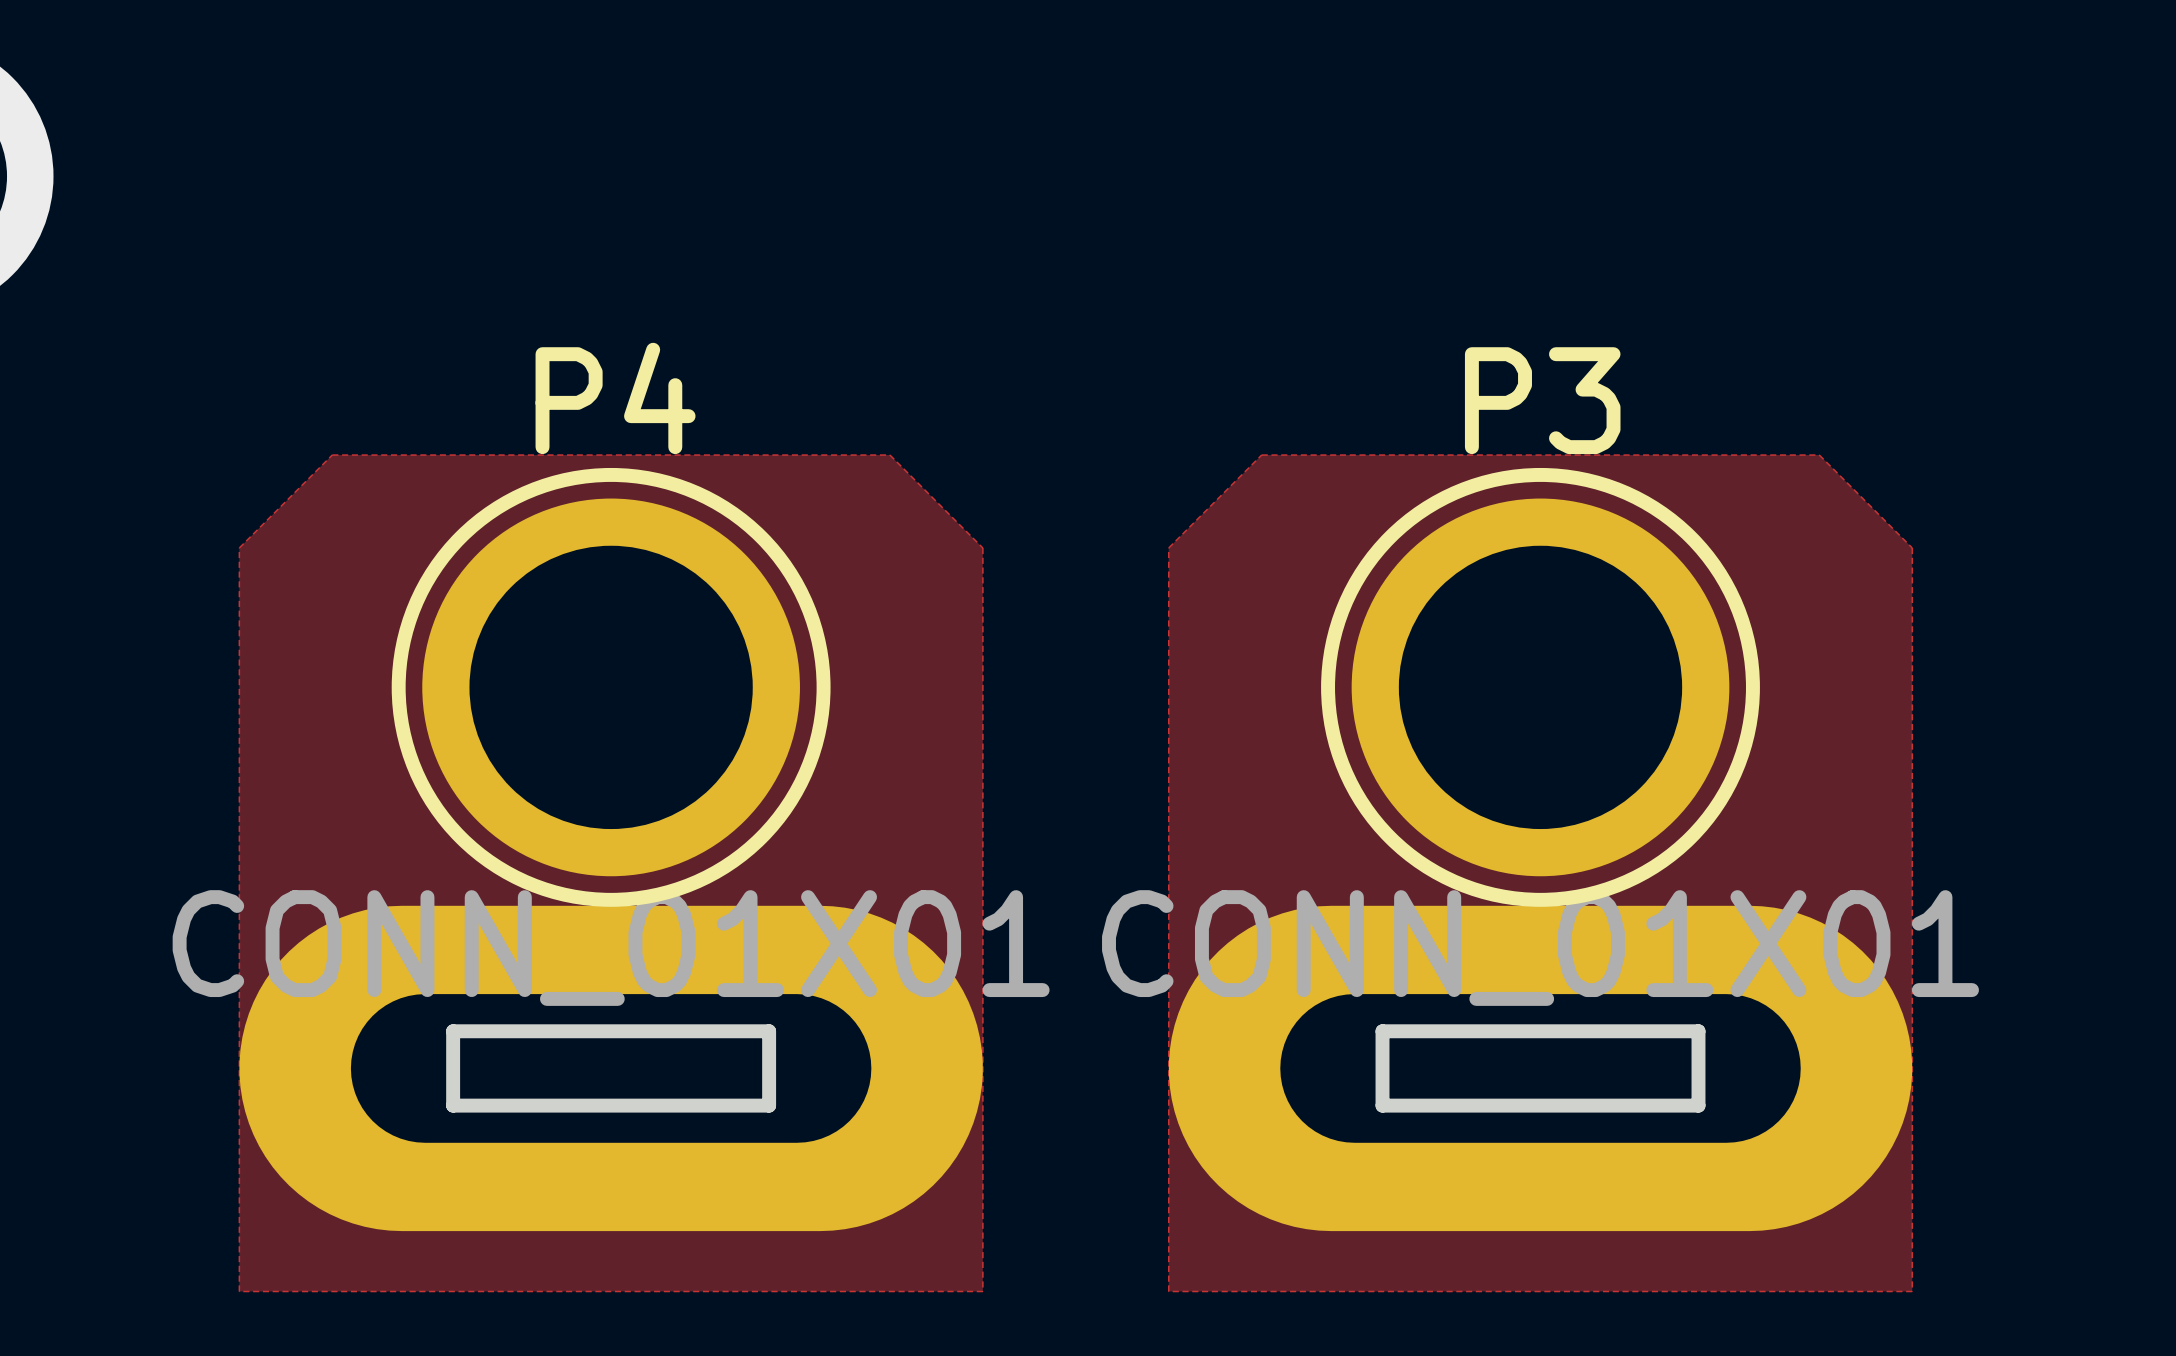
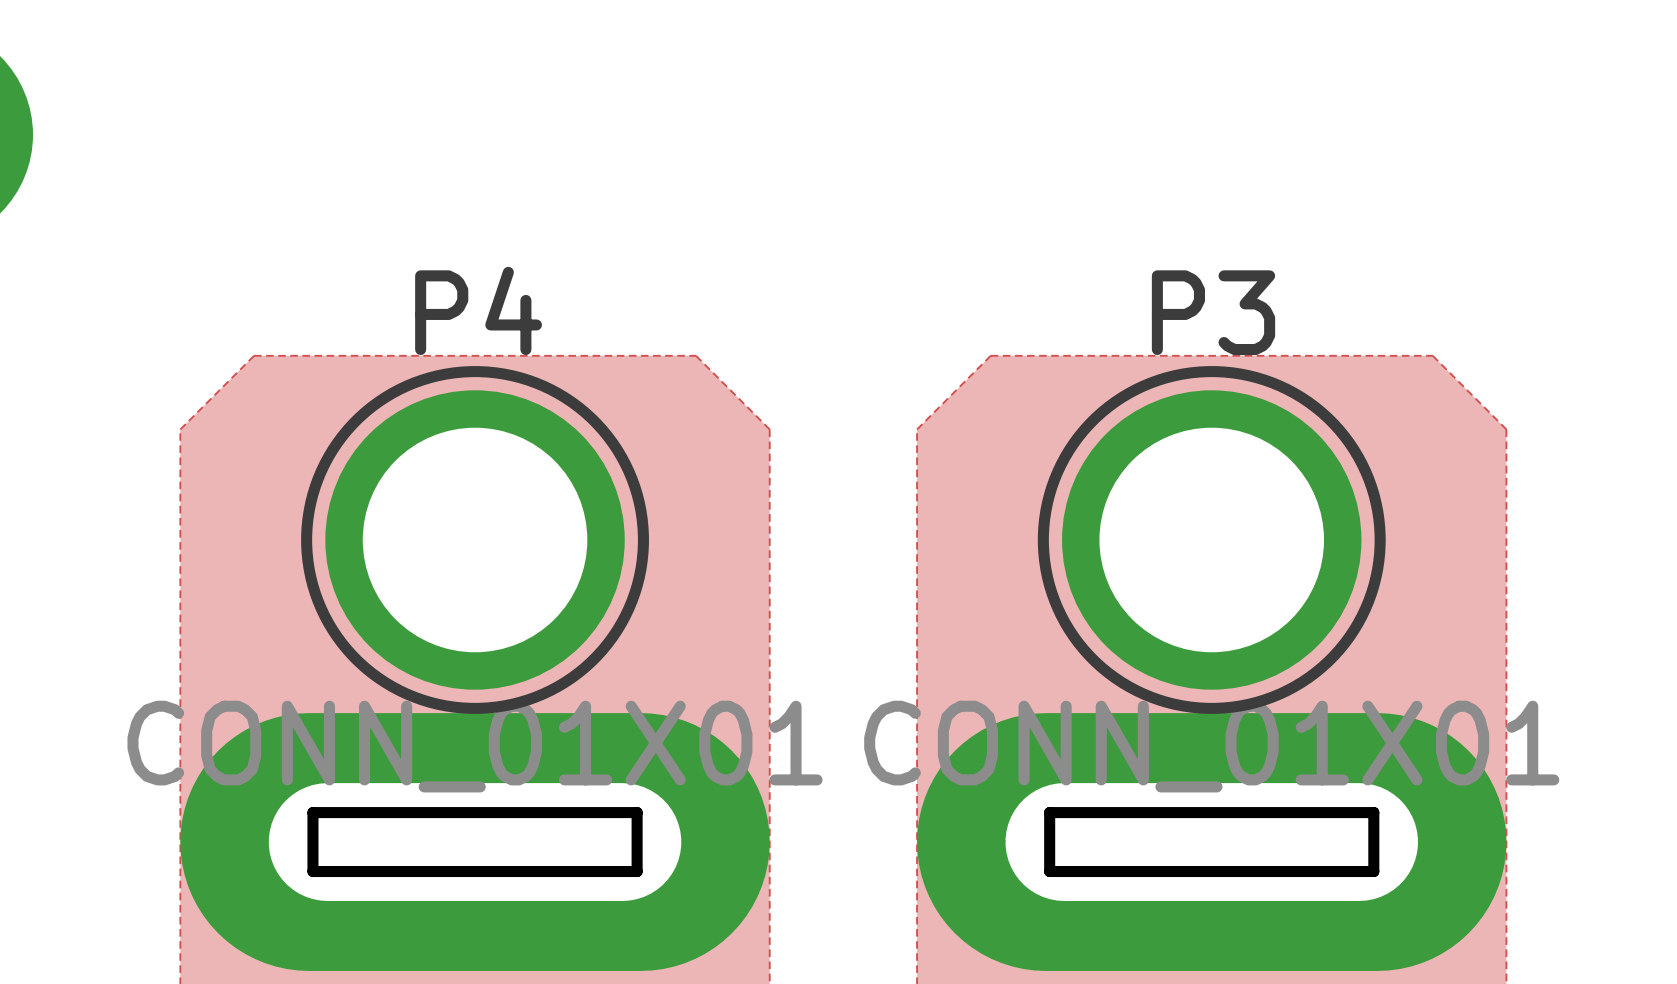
board edge: (453, 1031) (453, 1105) -> (349, 812) (312, 812) (312, 871) (349, 871)
board edge: (769, 1031) (769, 1105) -> (600, 812) (637, 812) (637, 871) (600, 871)
board edge: (1382, 1031) (1382, 1105) -> (1086, 812) (1049, 812) (1049, 871) (1086, 871)
board edge: (1698, 1031) (1698, 1105) -> (1336, 812) (1373, 812) (1373, 871) (1336, 871)

